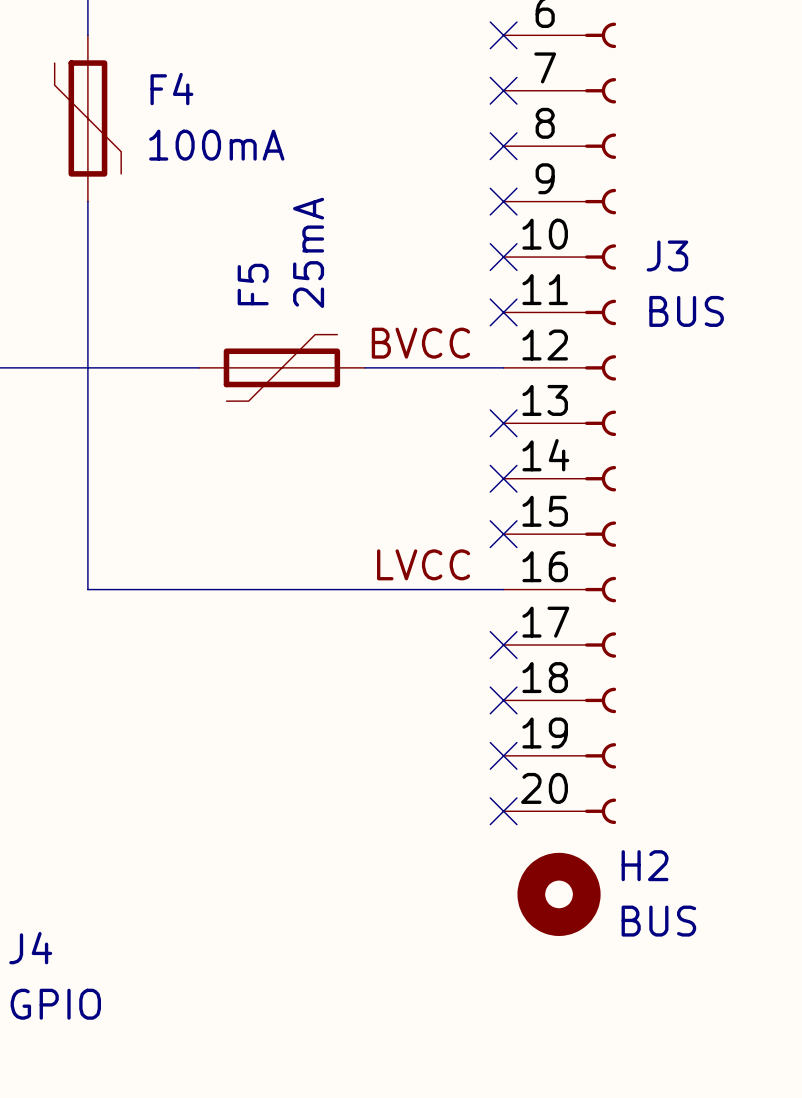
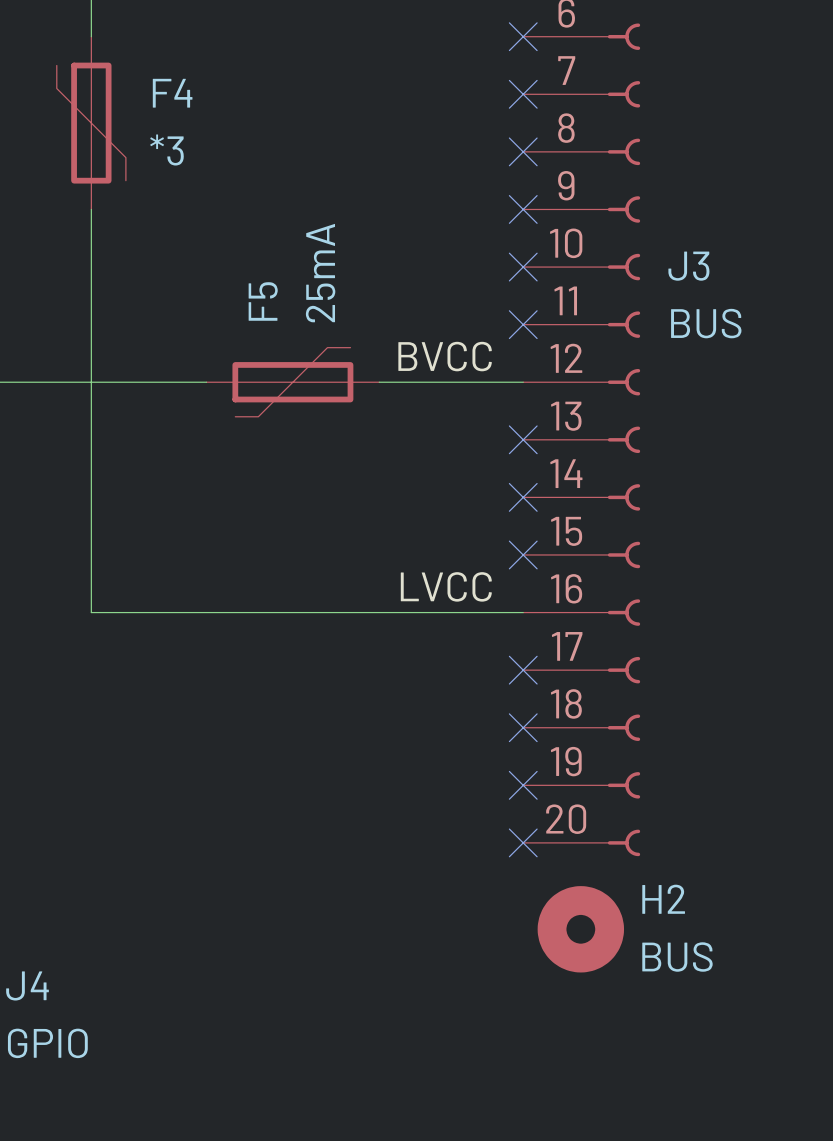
F4 value: 100mA (216, 145) -> *3 (167, 150)

